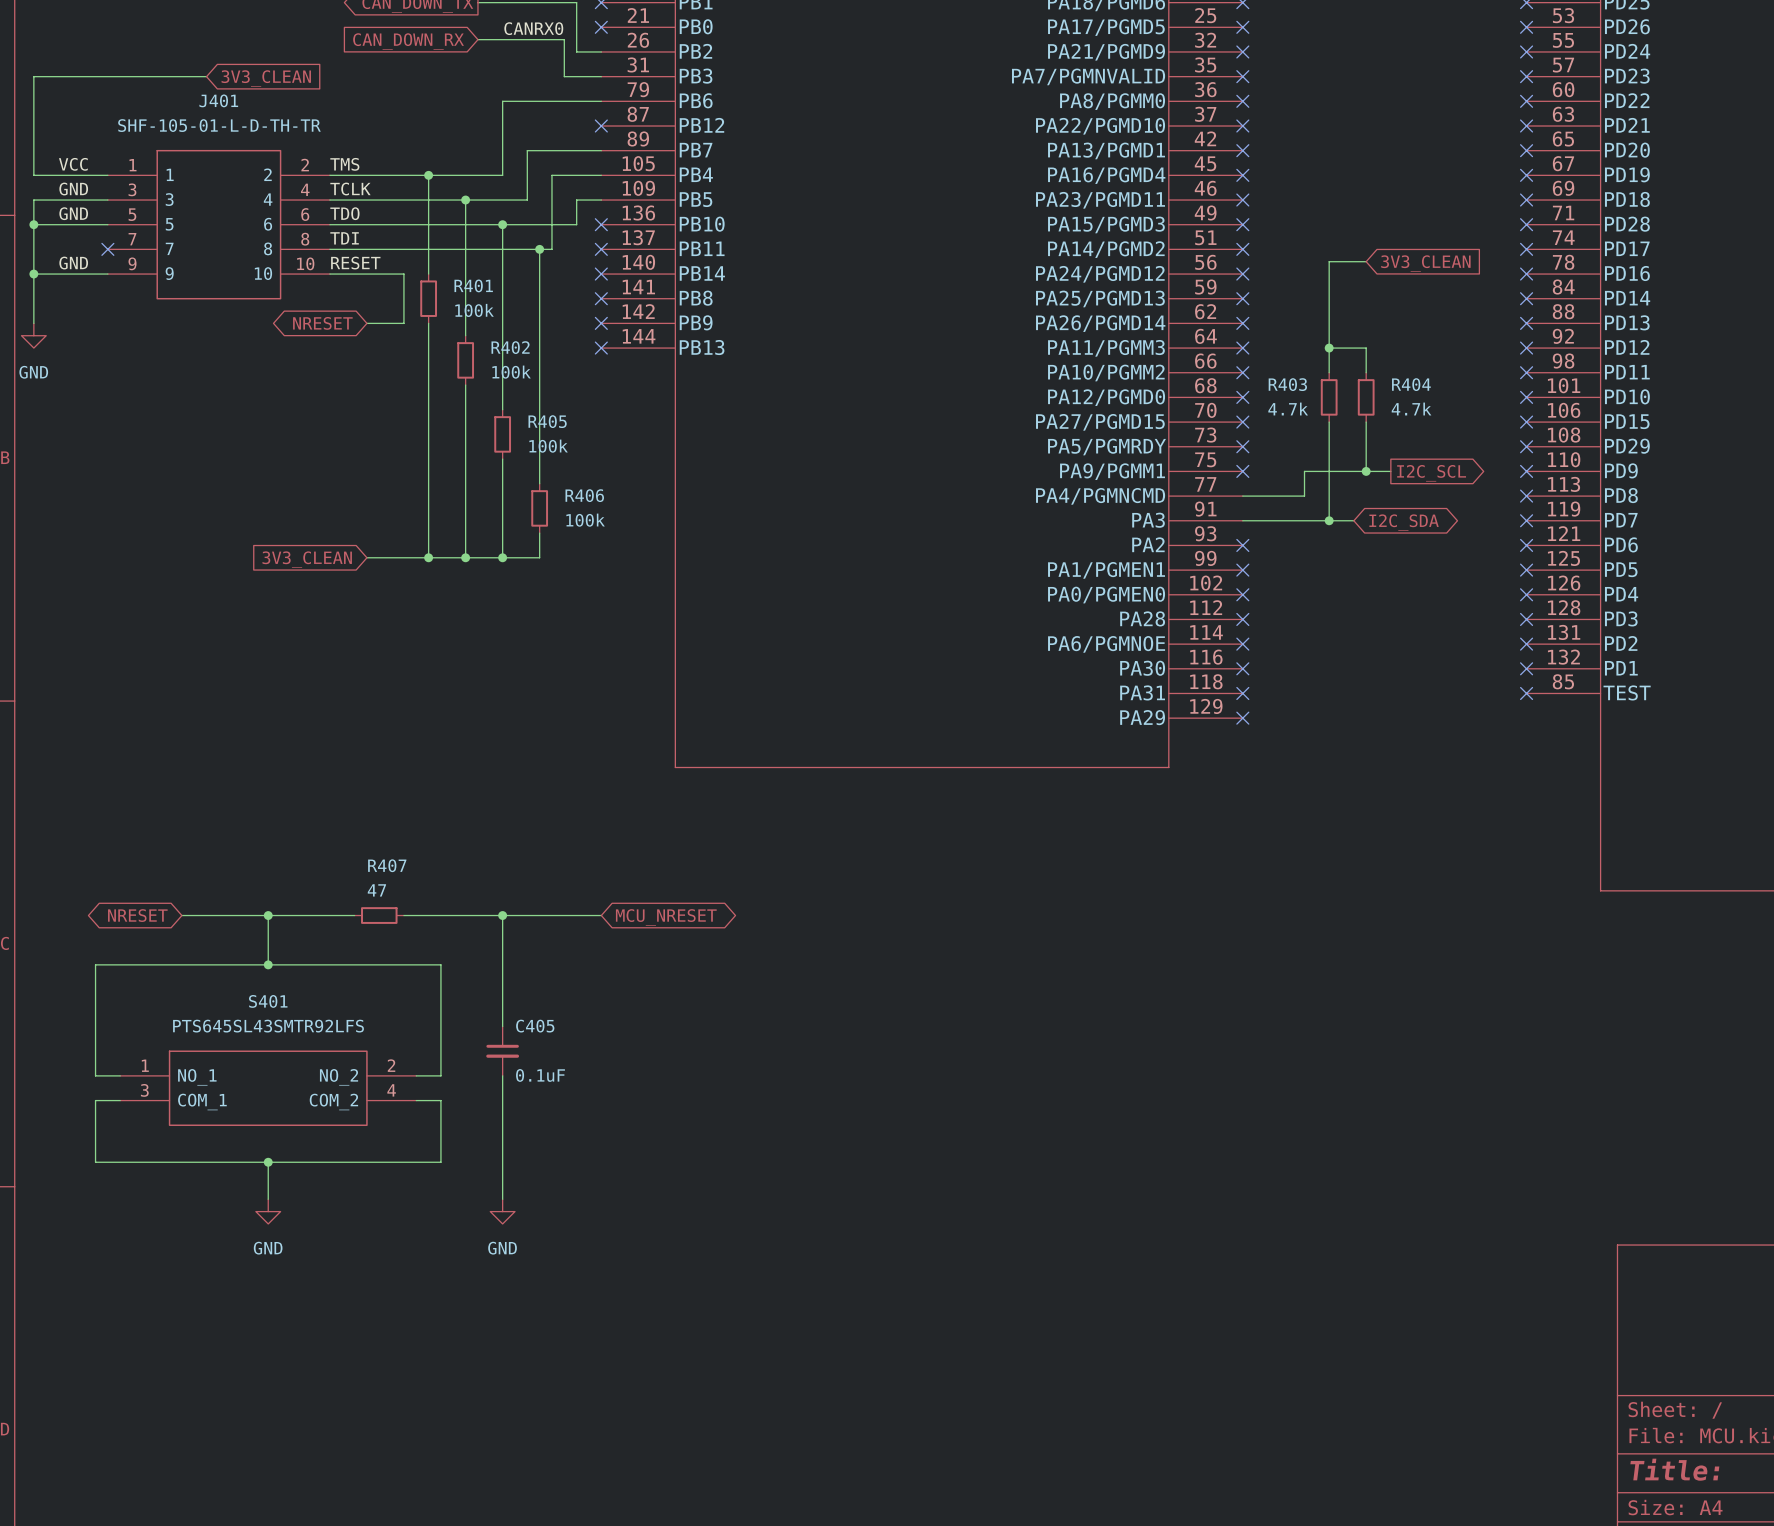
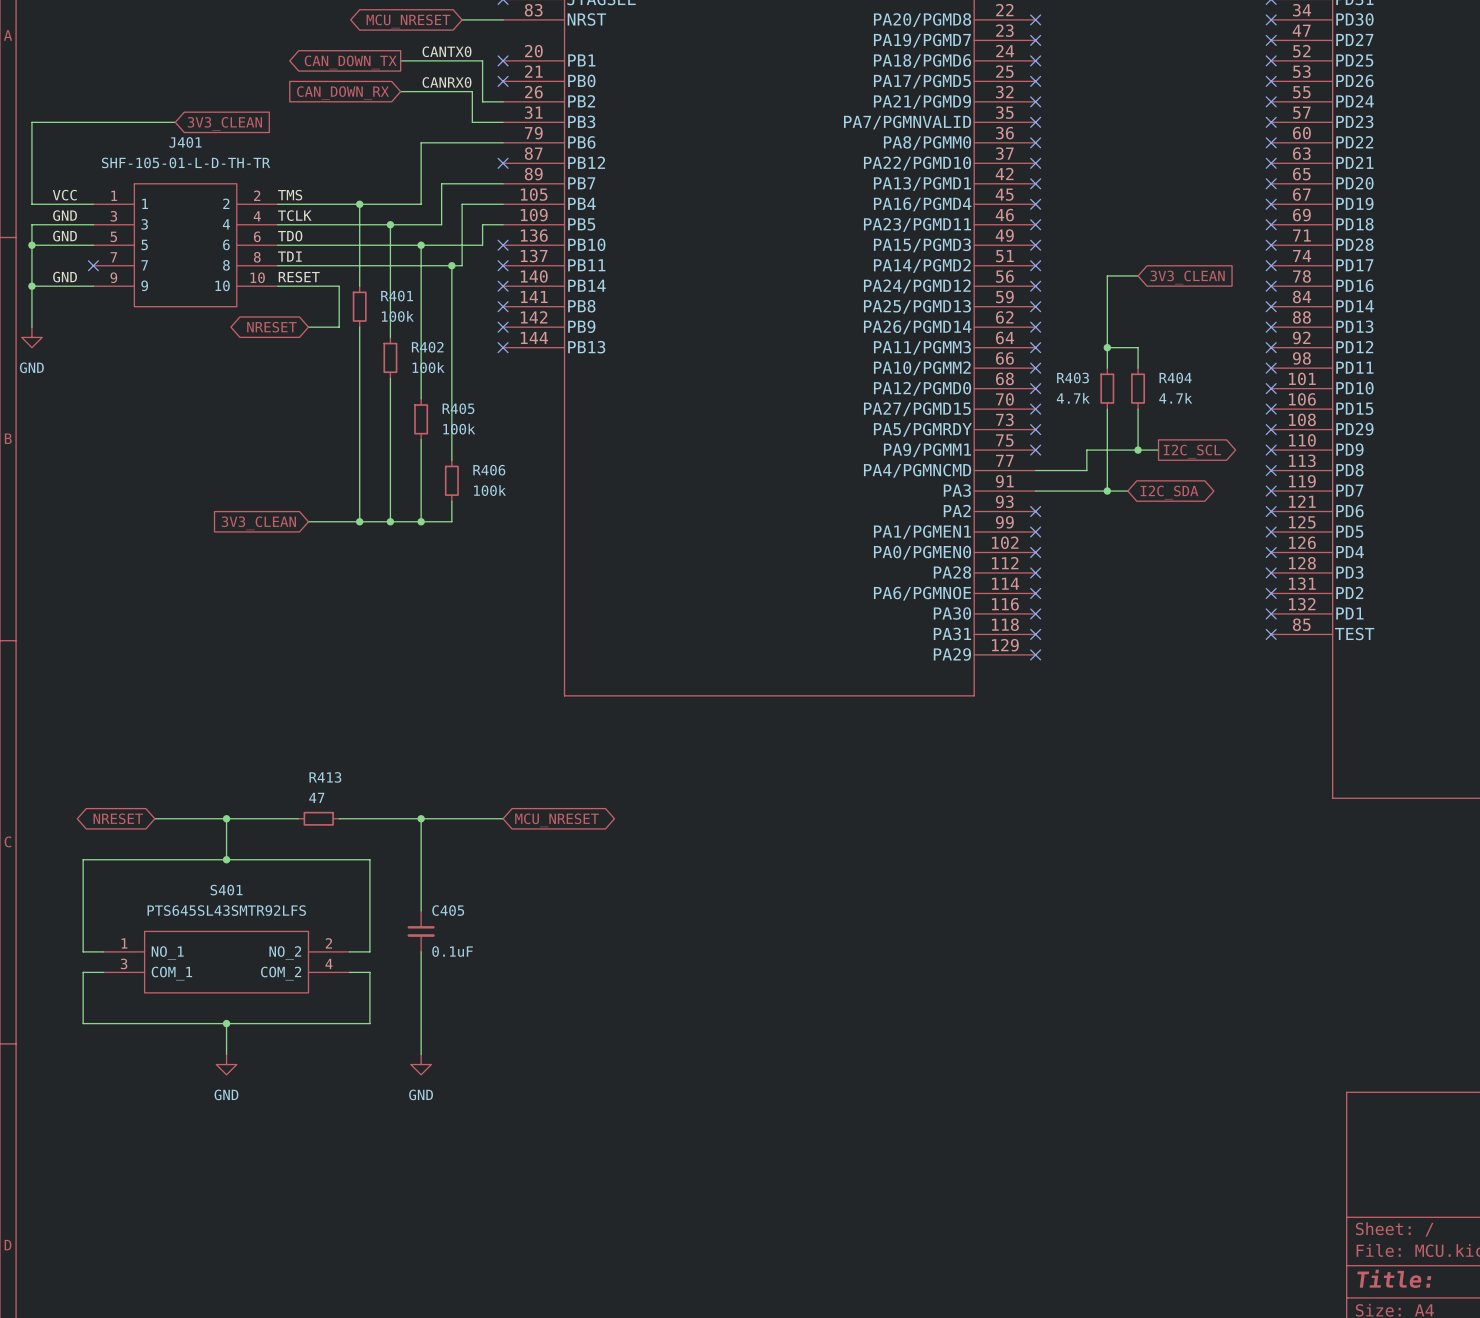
R407 name: R407 (387, 865) -> R413 (325, 777)

